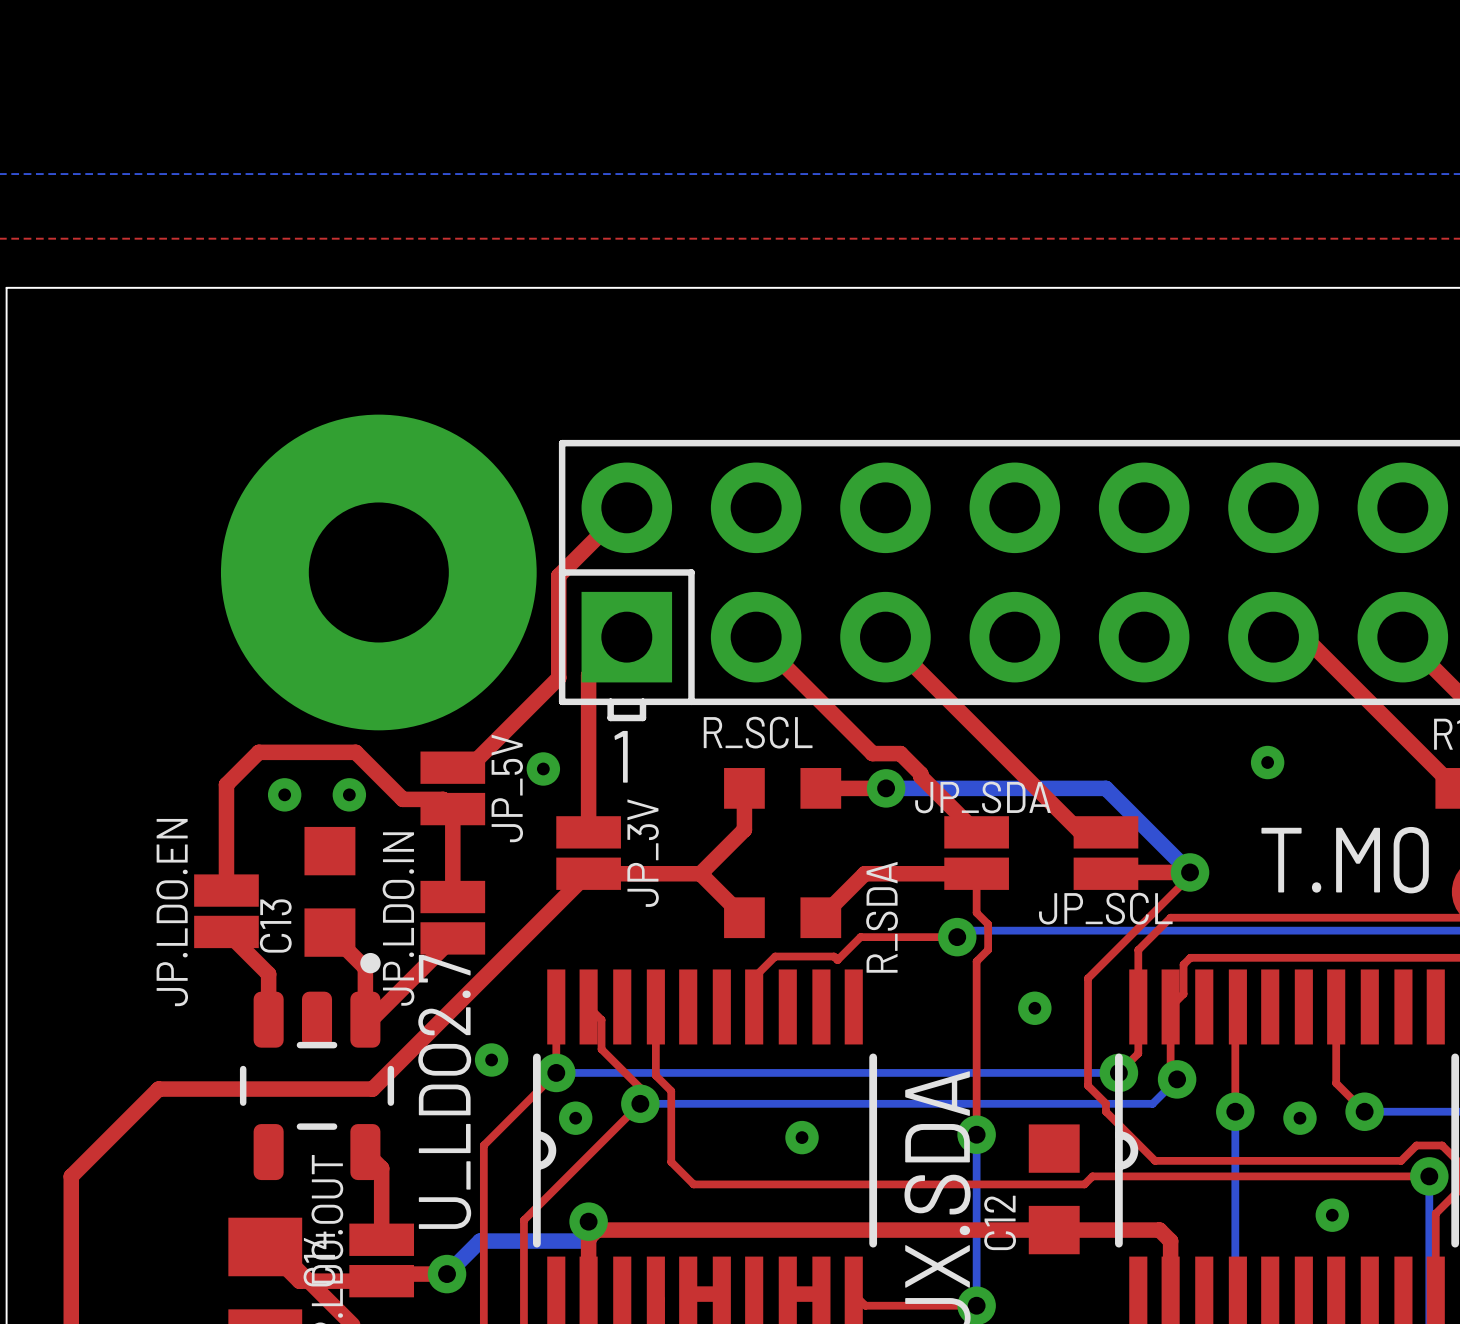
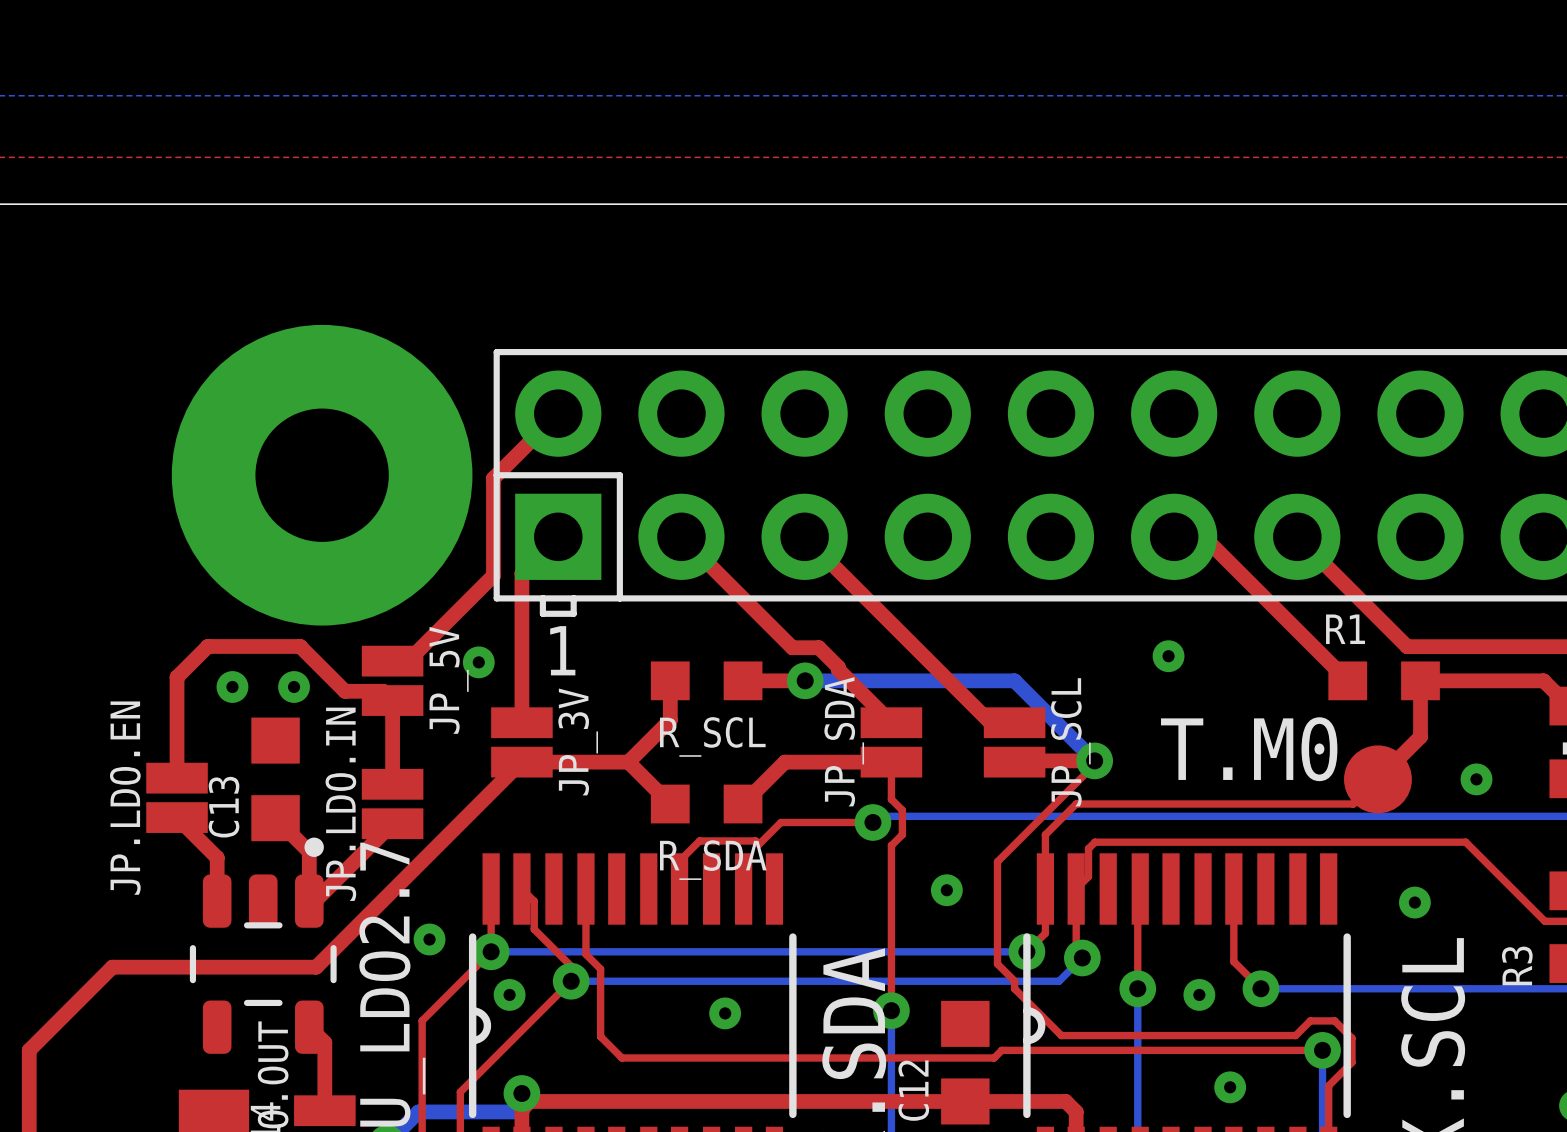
R_SCL name position: R_SCL (758, 732) -> R_SCL (712, 736)
JP_SDA name rotation: 0° (982, 797) -> 90° counterclockwise (844, 741)
JP_SCL name rotation: 0° (1105, 908) -> 90° counterclockwise (1070, 742)
R_SDA name rotation: 0° (882, 917) -> 90° clockwise (713, 860)

